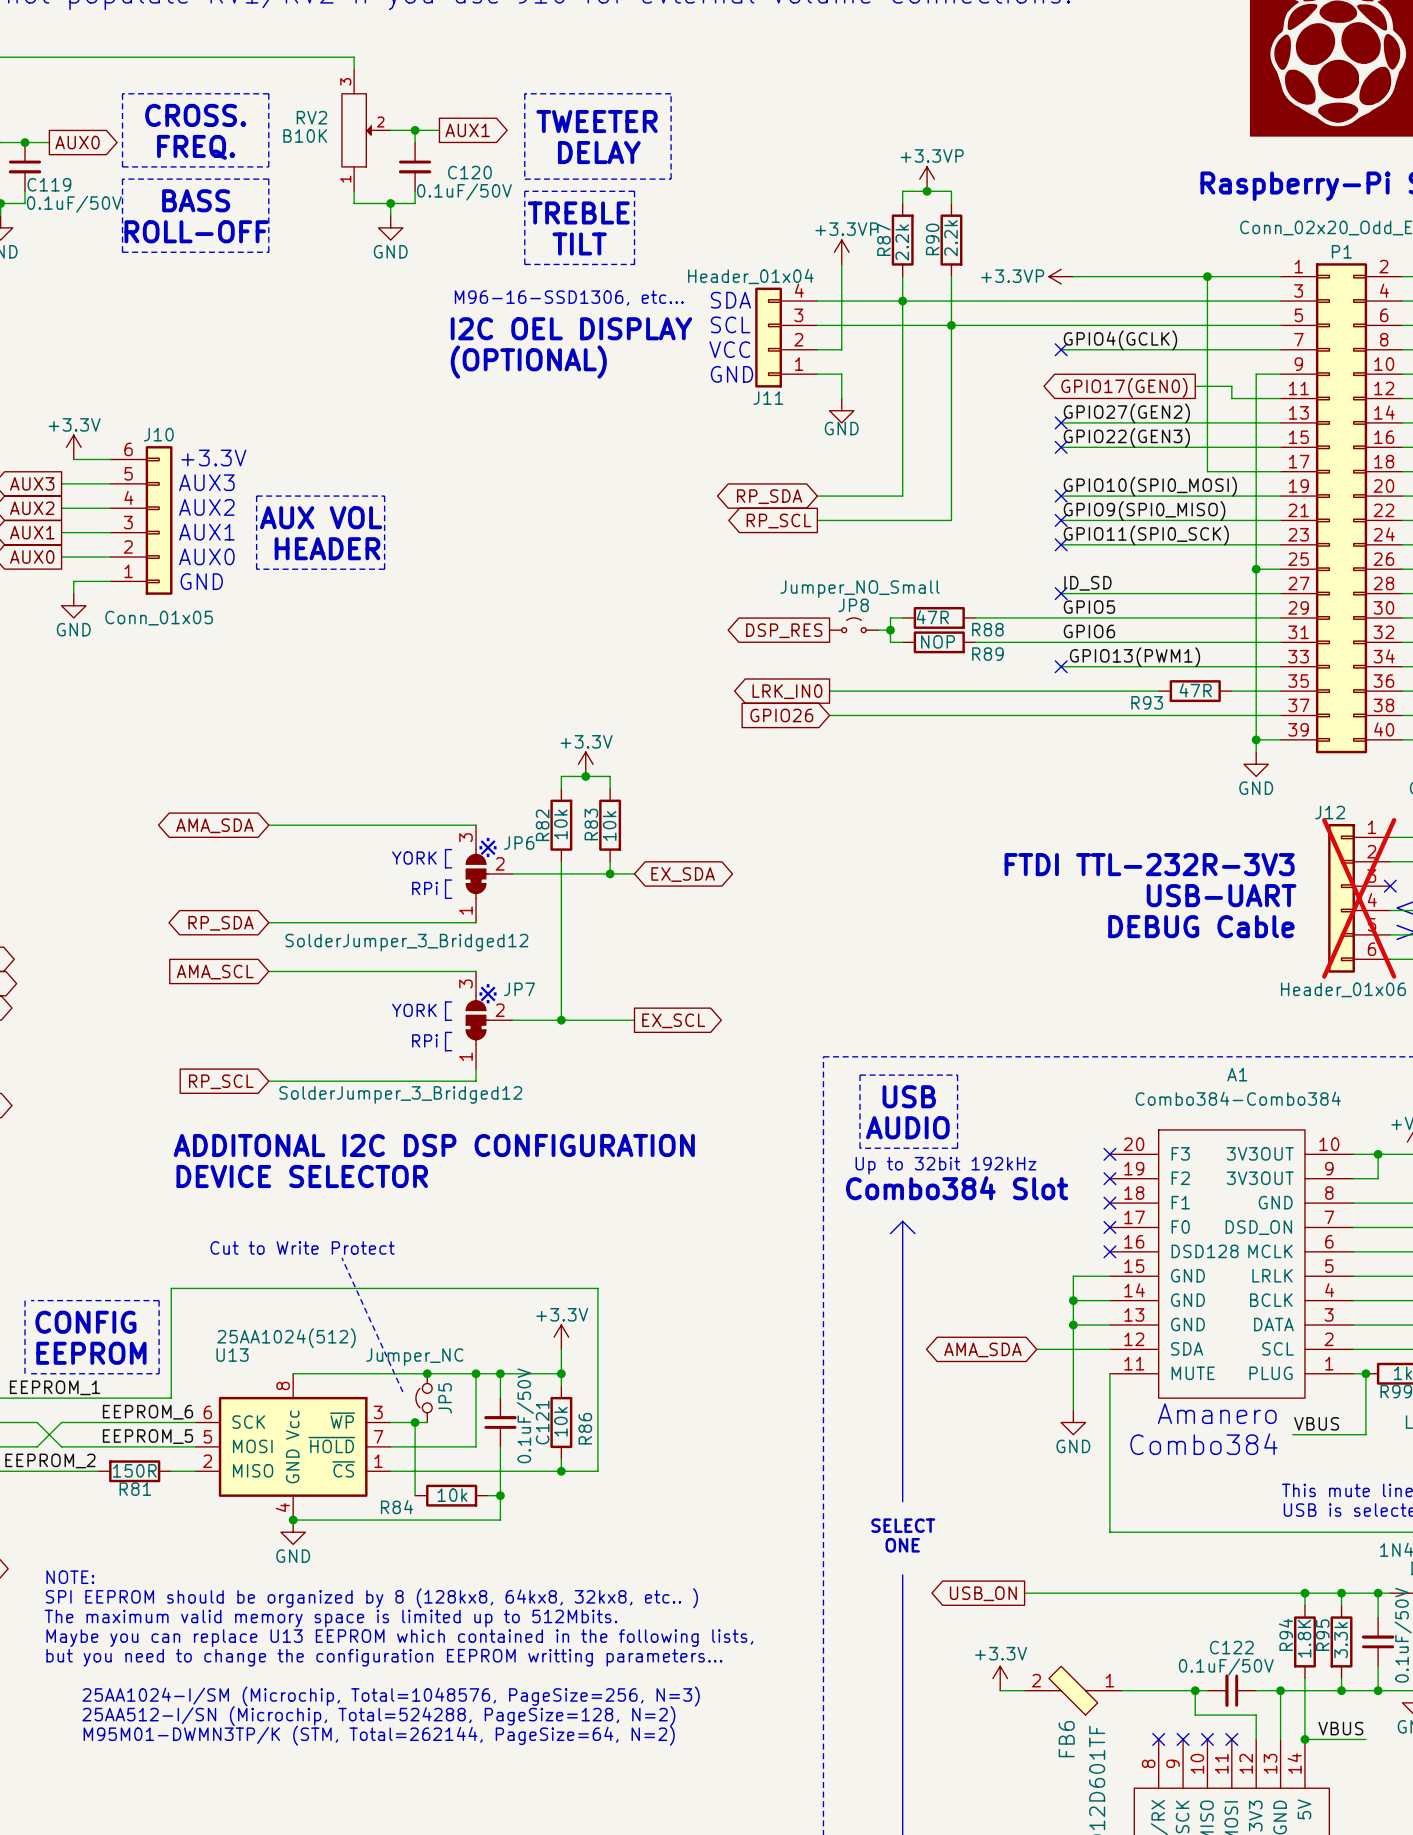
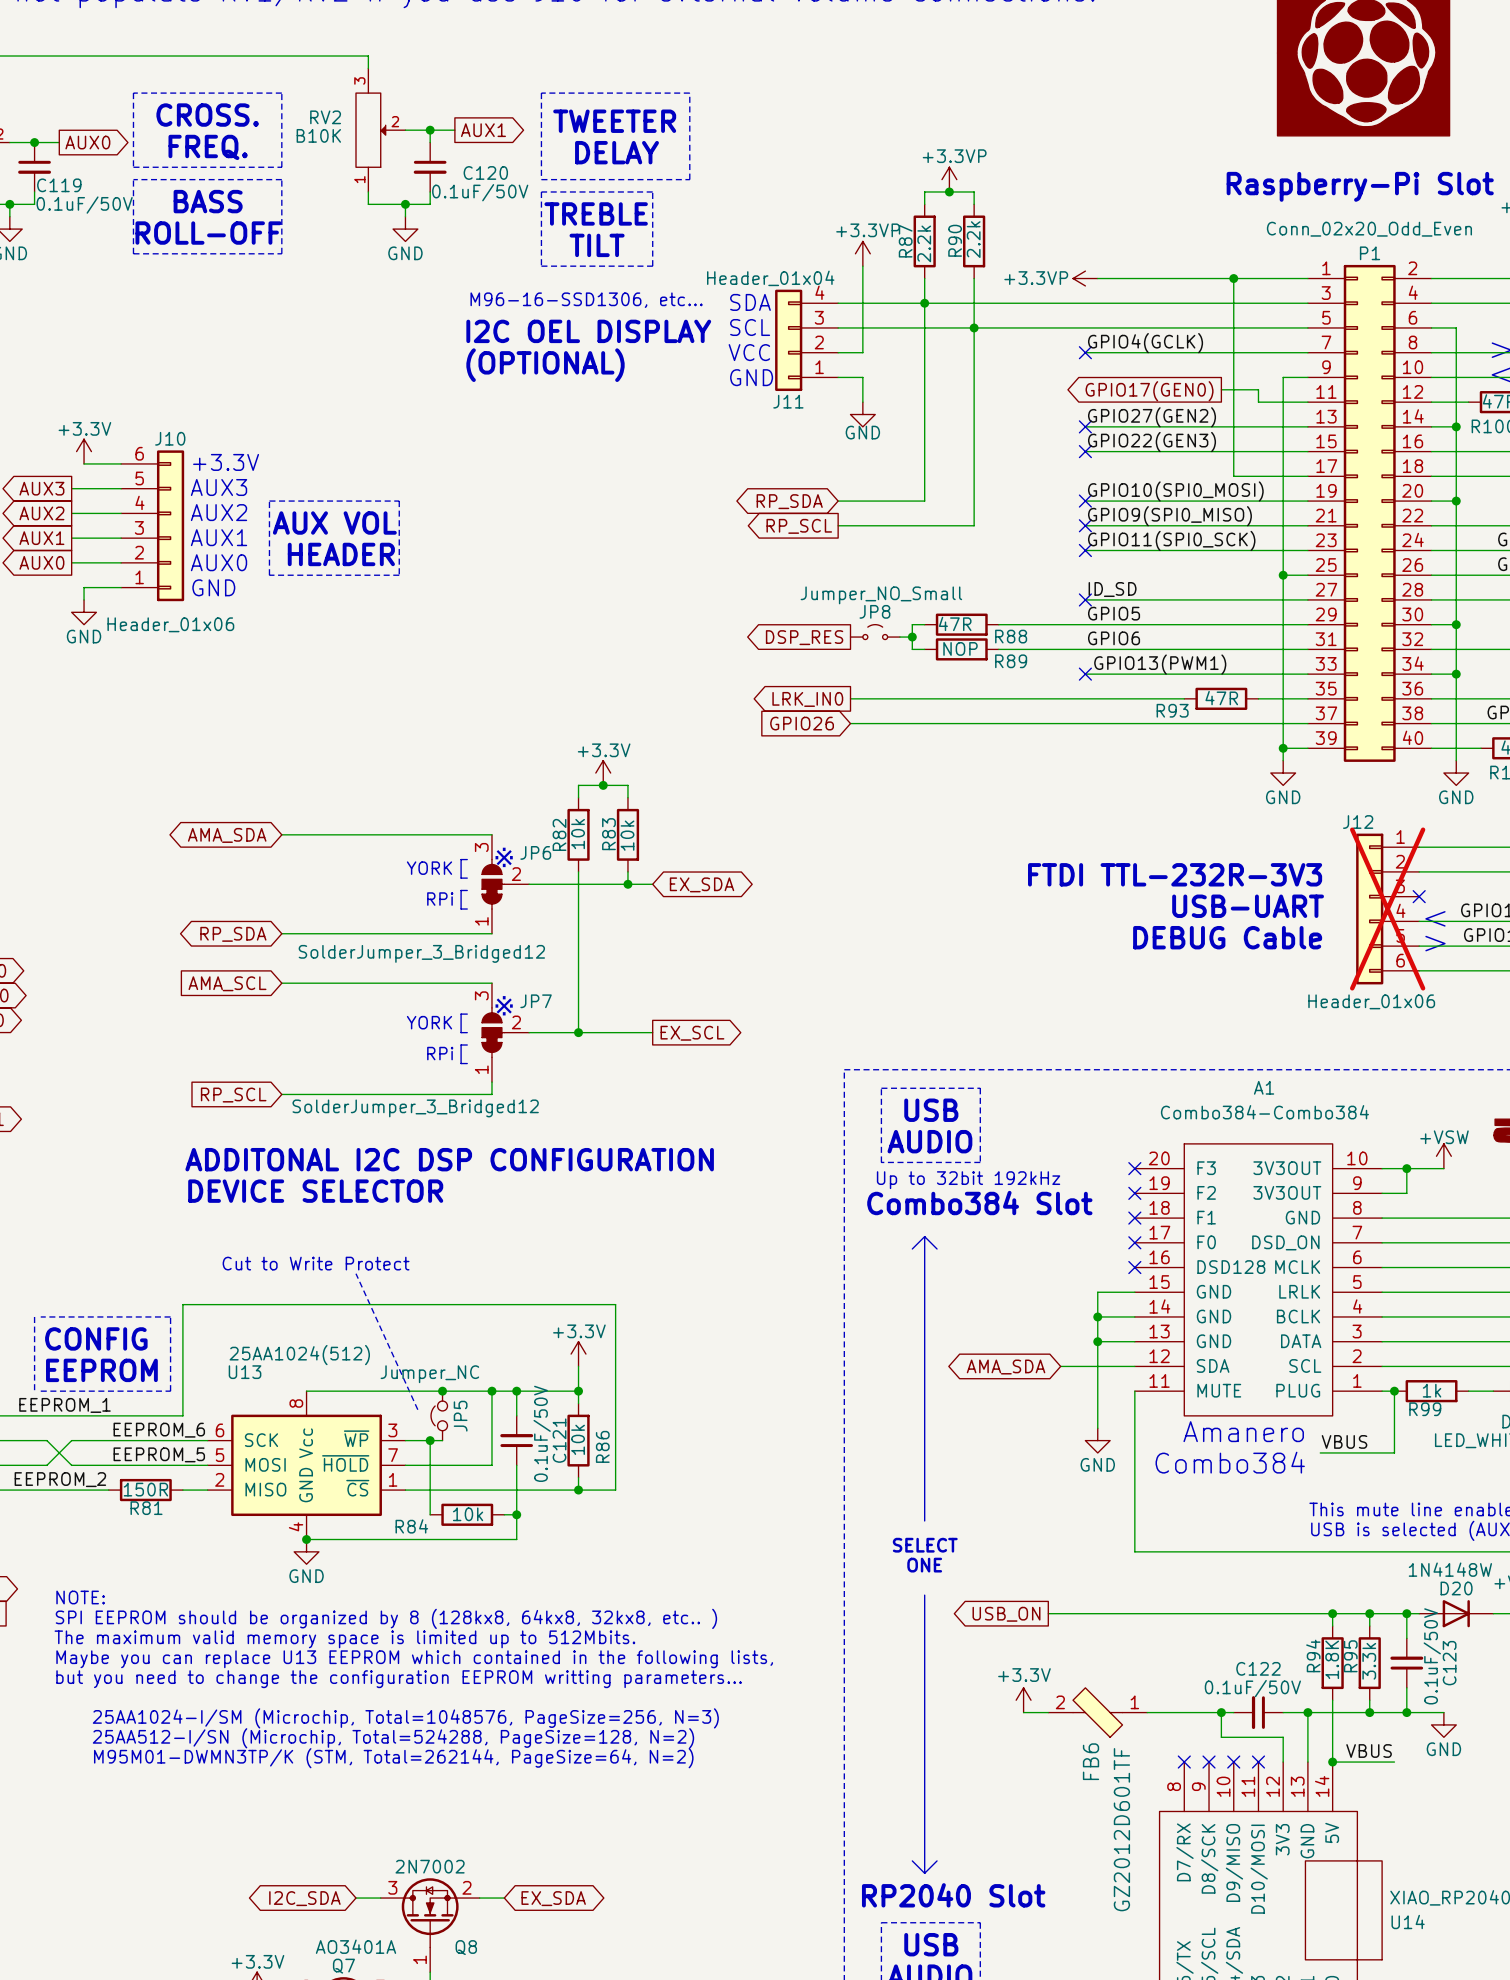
J10 value: Conn_01x05 (159, 618) -> Header_01x06 (170, 624)

